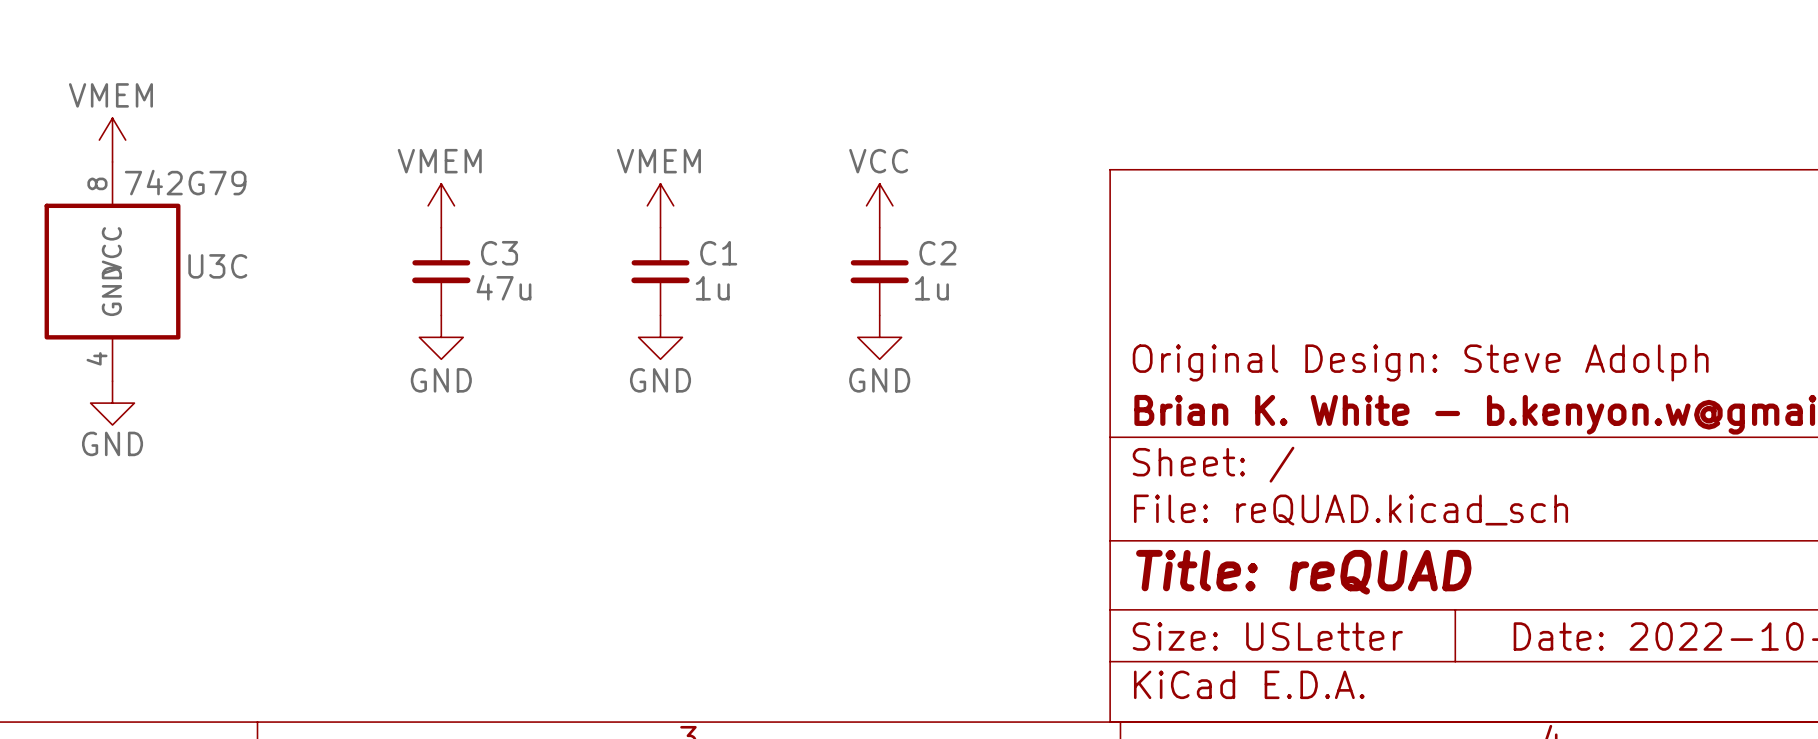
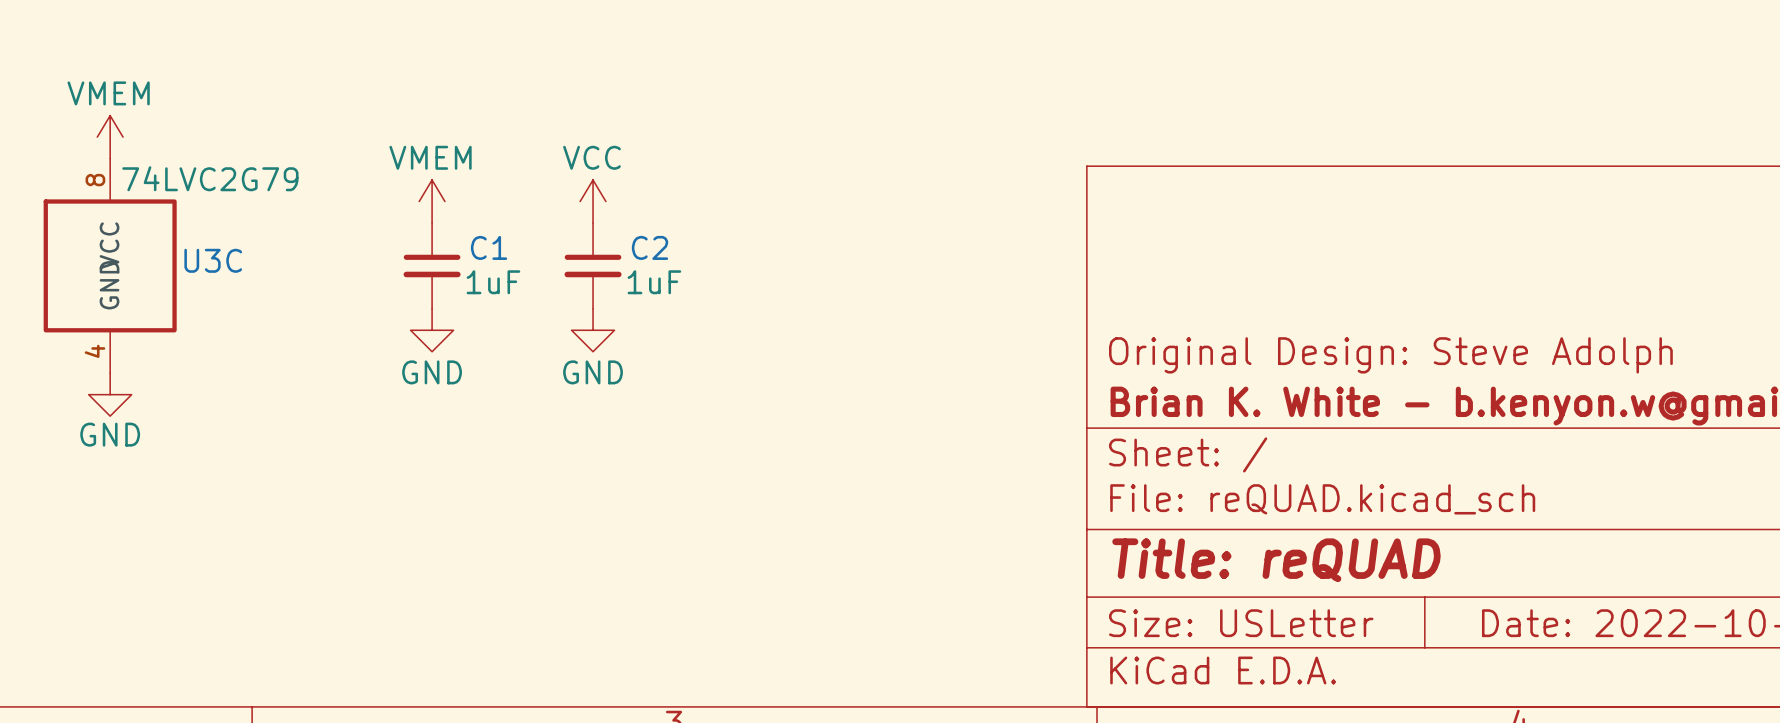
U3C value: 742G79 (185, 182) -> 74LVC2G79 (210, 178)
power symbol: VMEM (660, 205) -> none
power symbol position: VCC (879, 205) -> VCC (593, 201)
C3 name: C3 (499, 253) -> C1 (489, 247)
C1: 1u (660, 271) -> none
C2 position: (879, 271) -> (593, 265)
C3 value: 47u (504, 287) -> 1uF (493, 282)
C2 value: 1u (931, 288) -> 1uF (654, 282)
power symbol position: GND (660, 337) -> GND (593, 330)
power symbol: GND (879, 337) -> none

